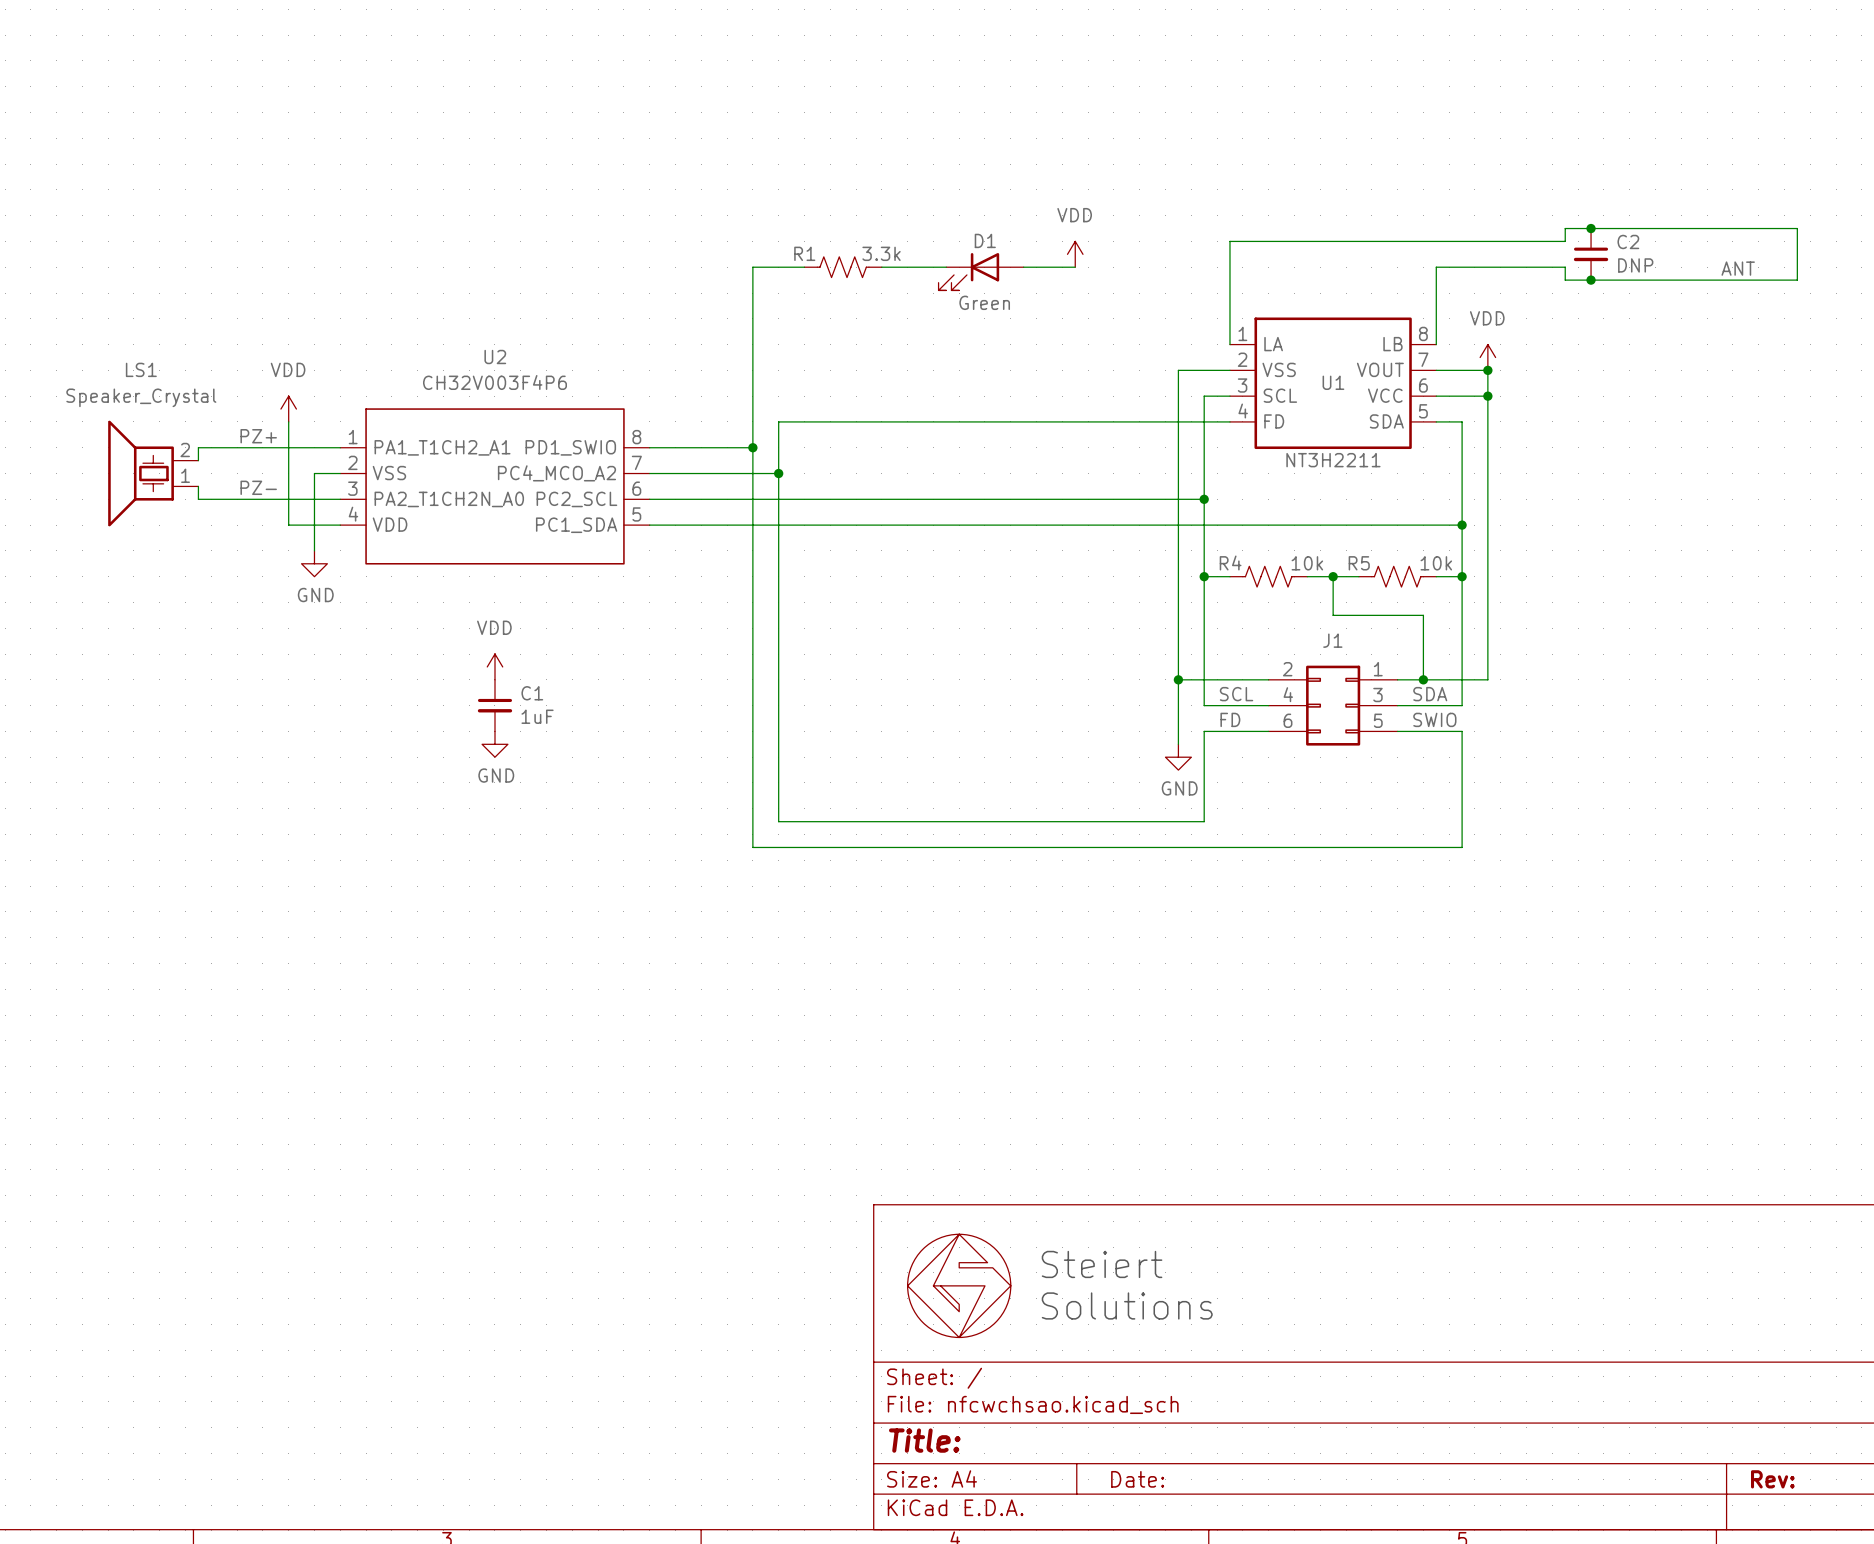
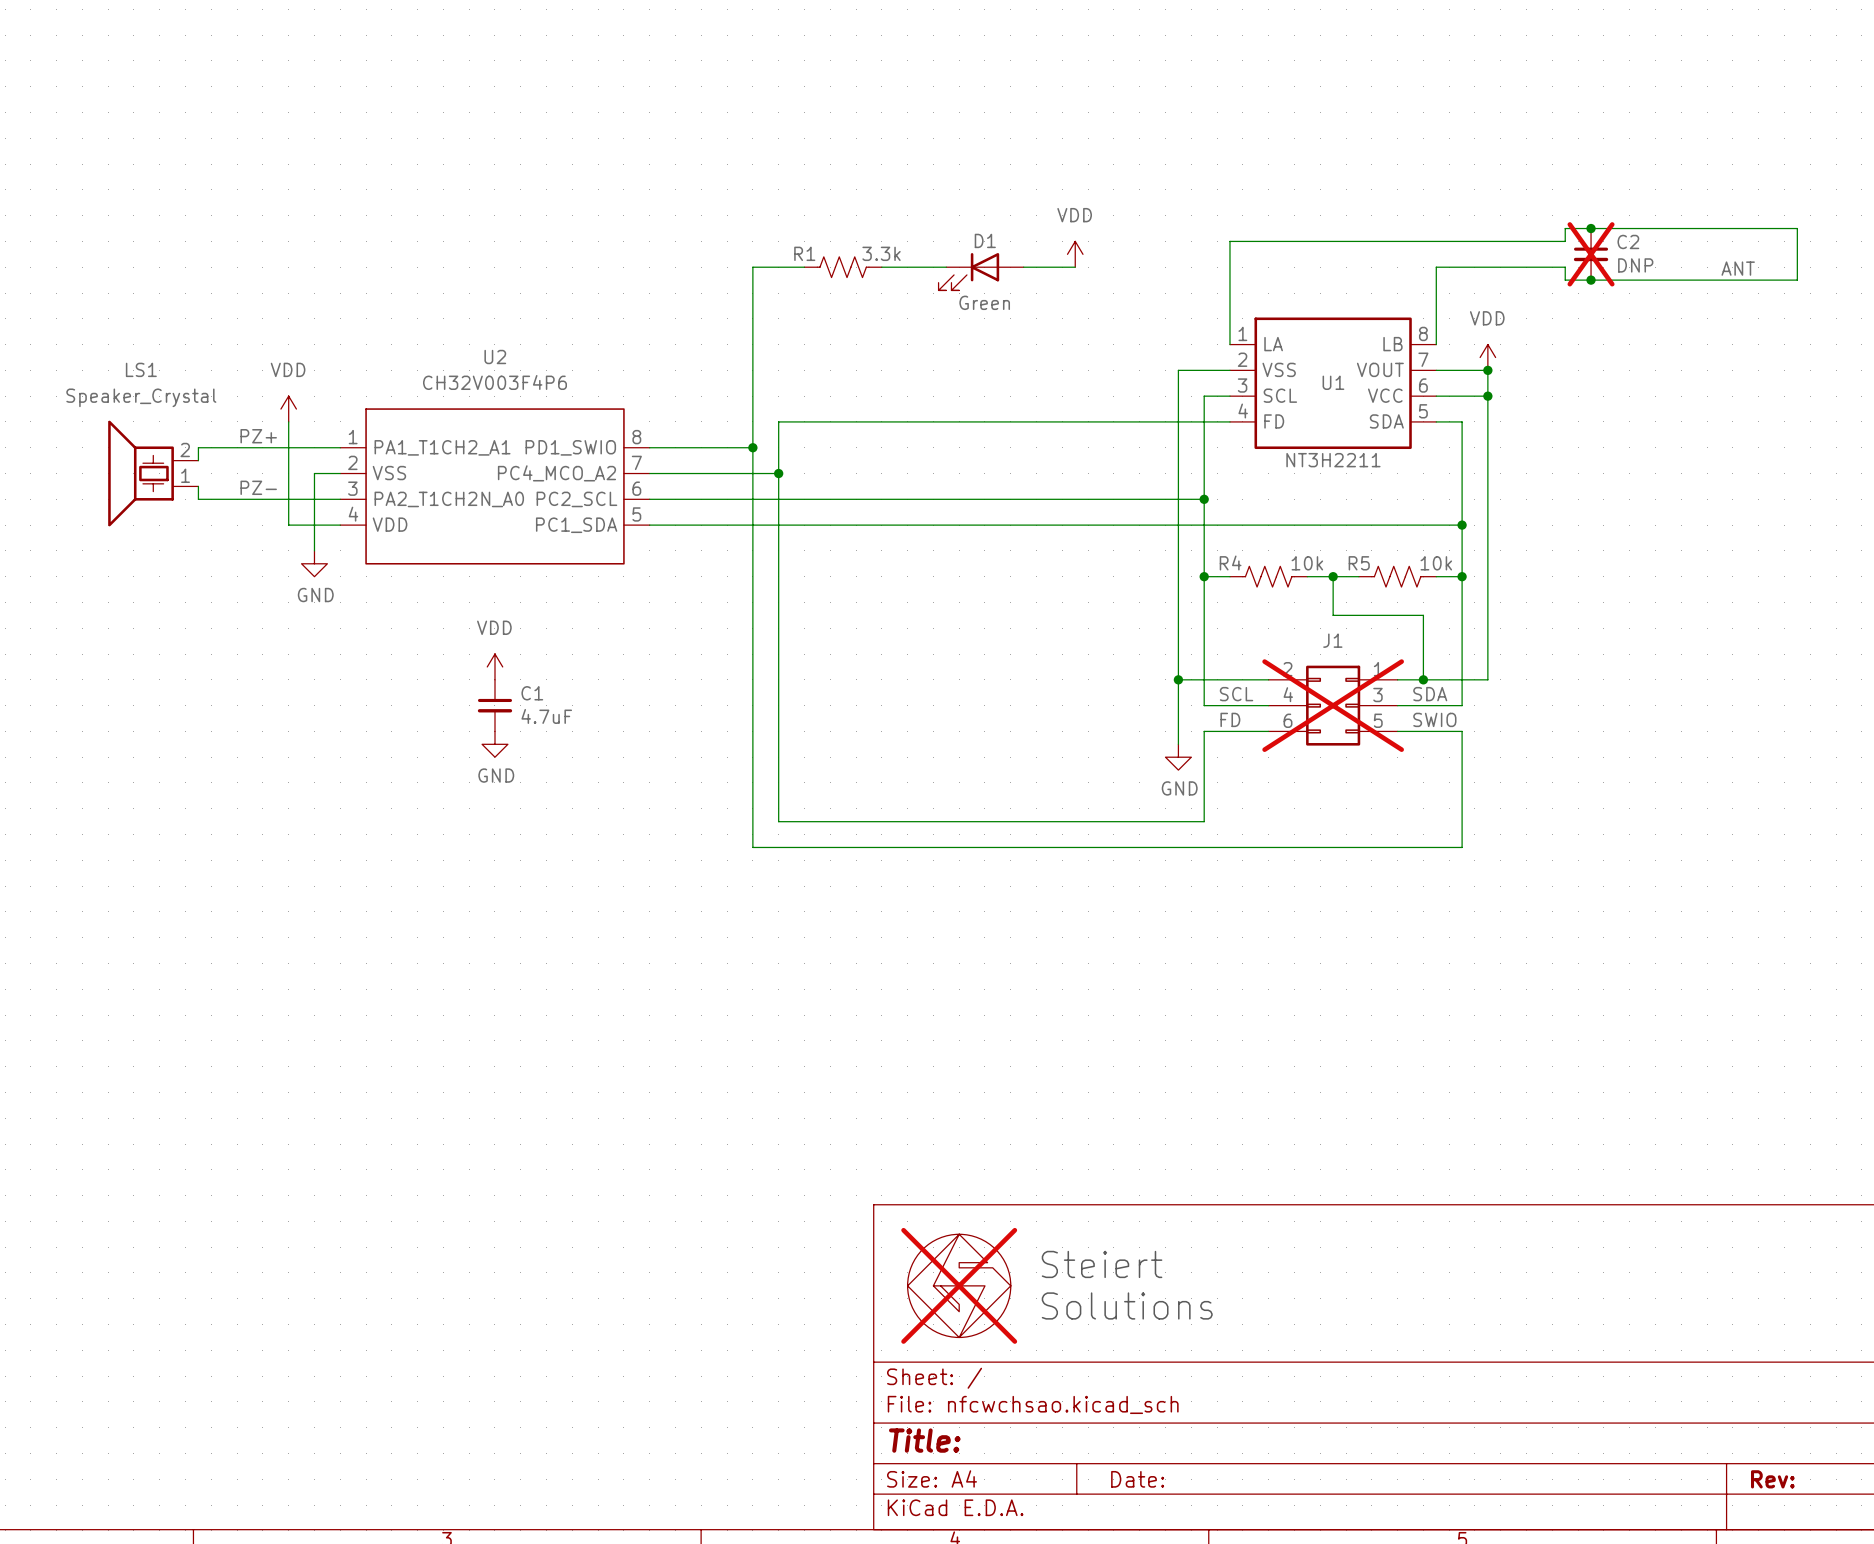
C2 do-not-place cross: none -> (1591, 254)
J1 do-not-place cross: none -> (1333, 705)
C1 value: 1uF (537, 716) -> 4.7uF (546, 716)
part do-not-place cross: none -> (959, 1285)

